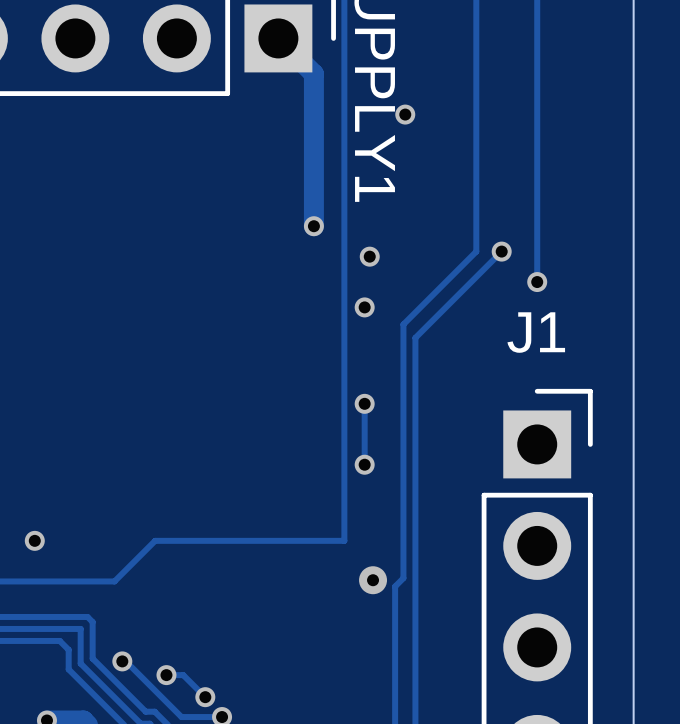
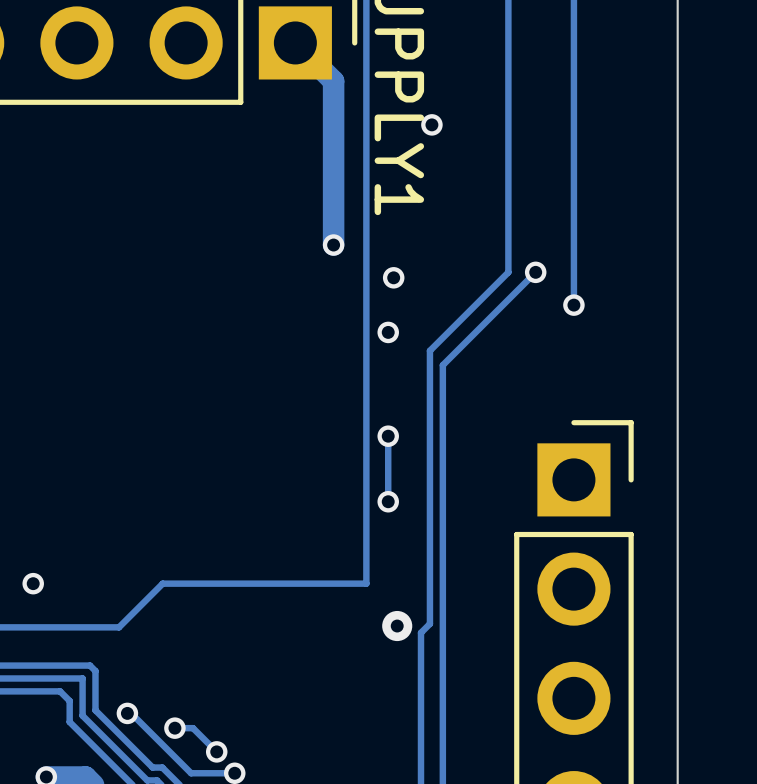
J1 name: J1 (536, 332) -> none

